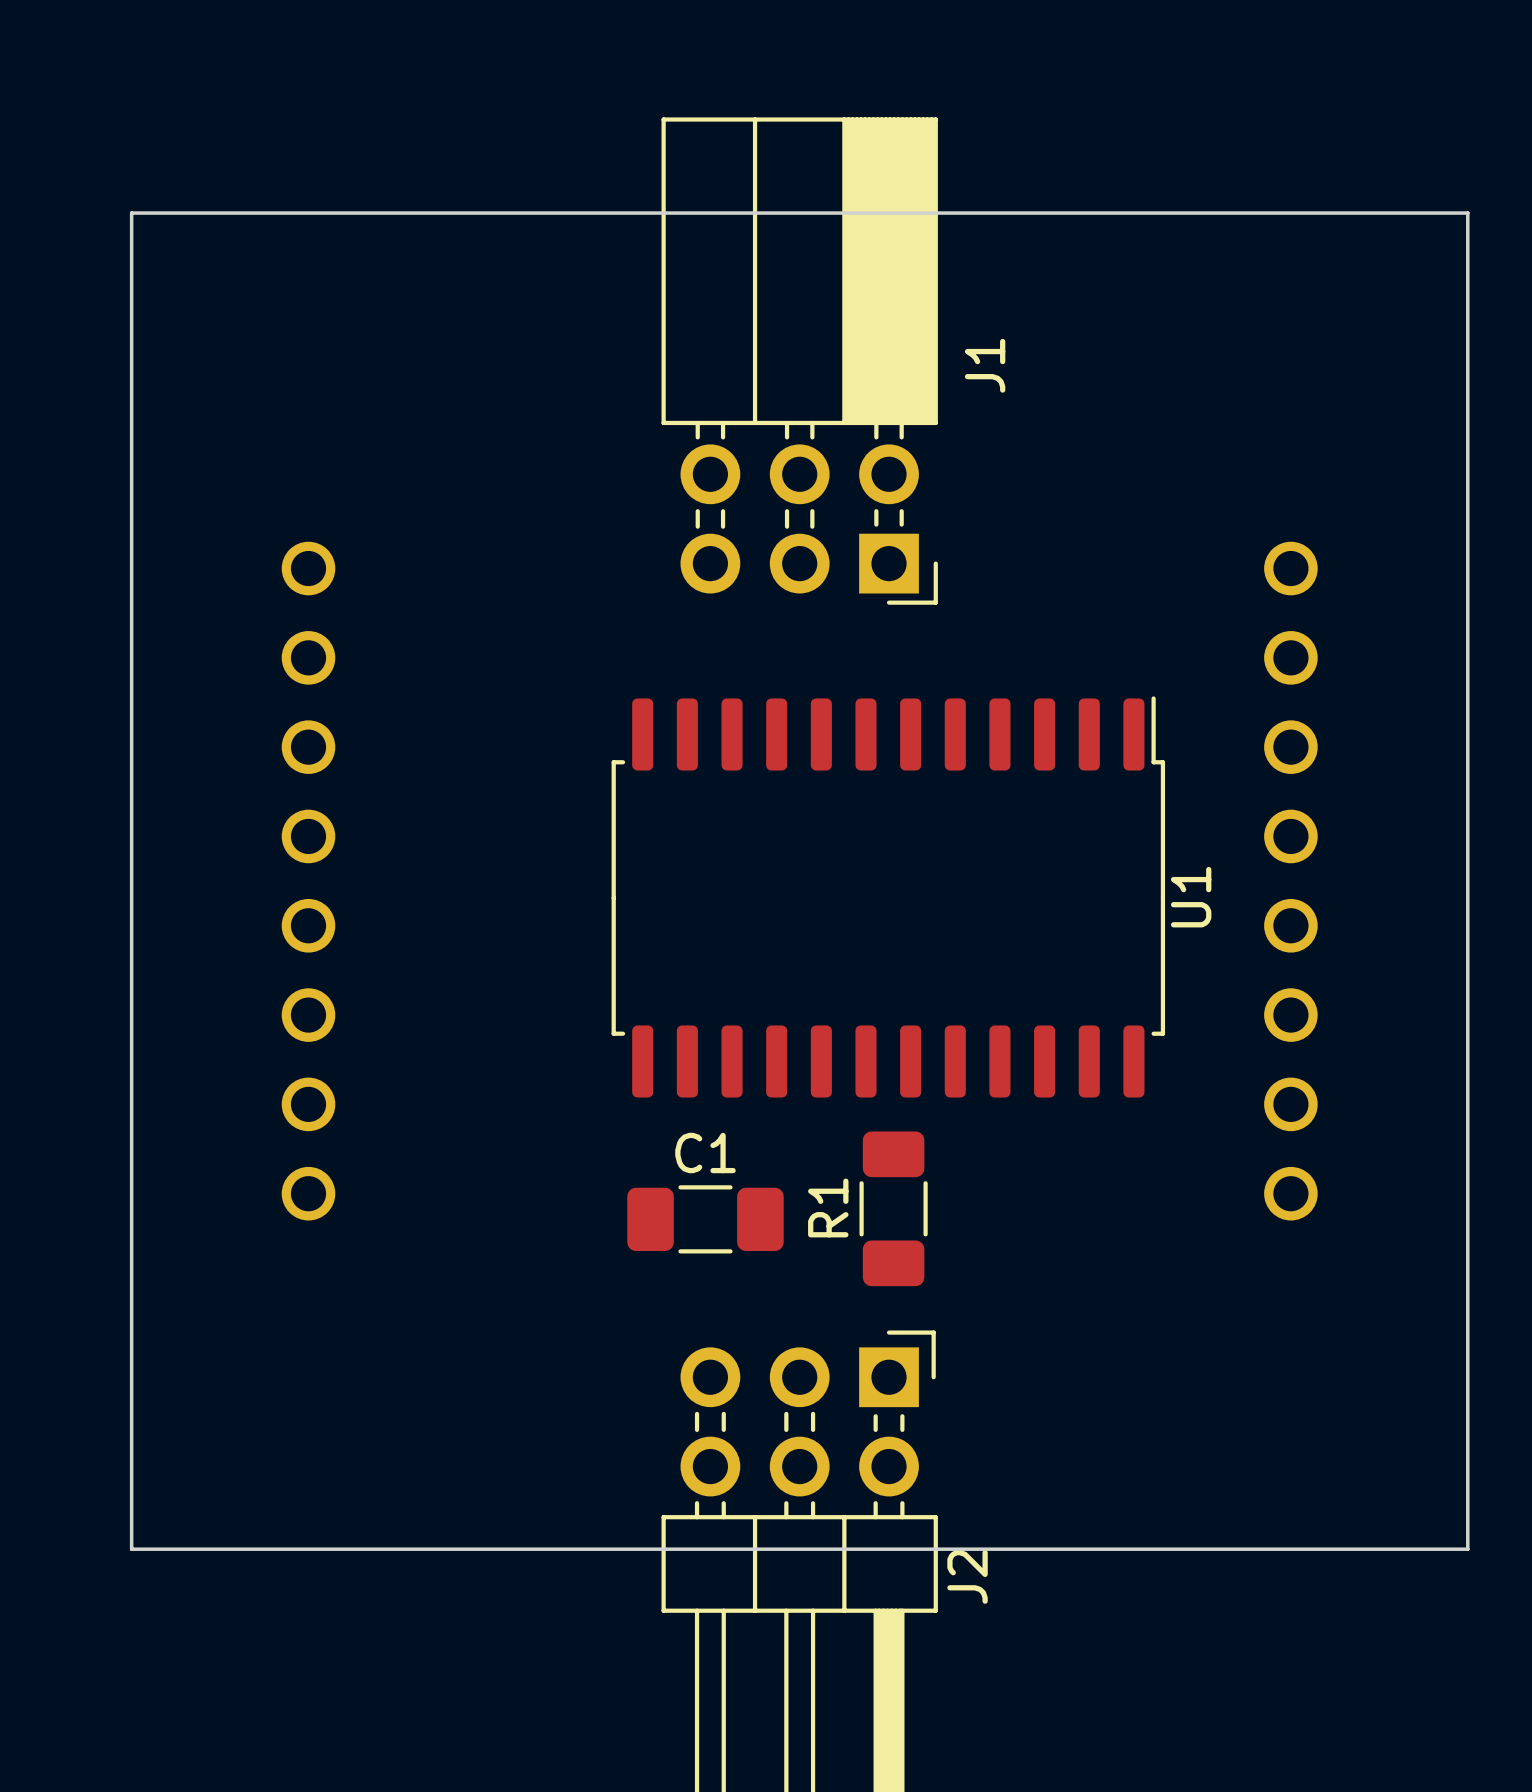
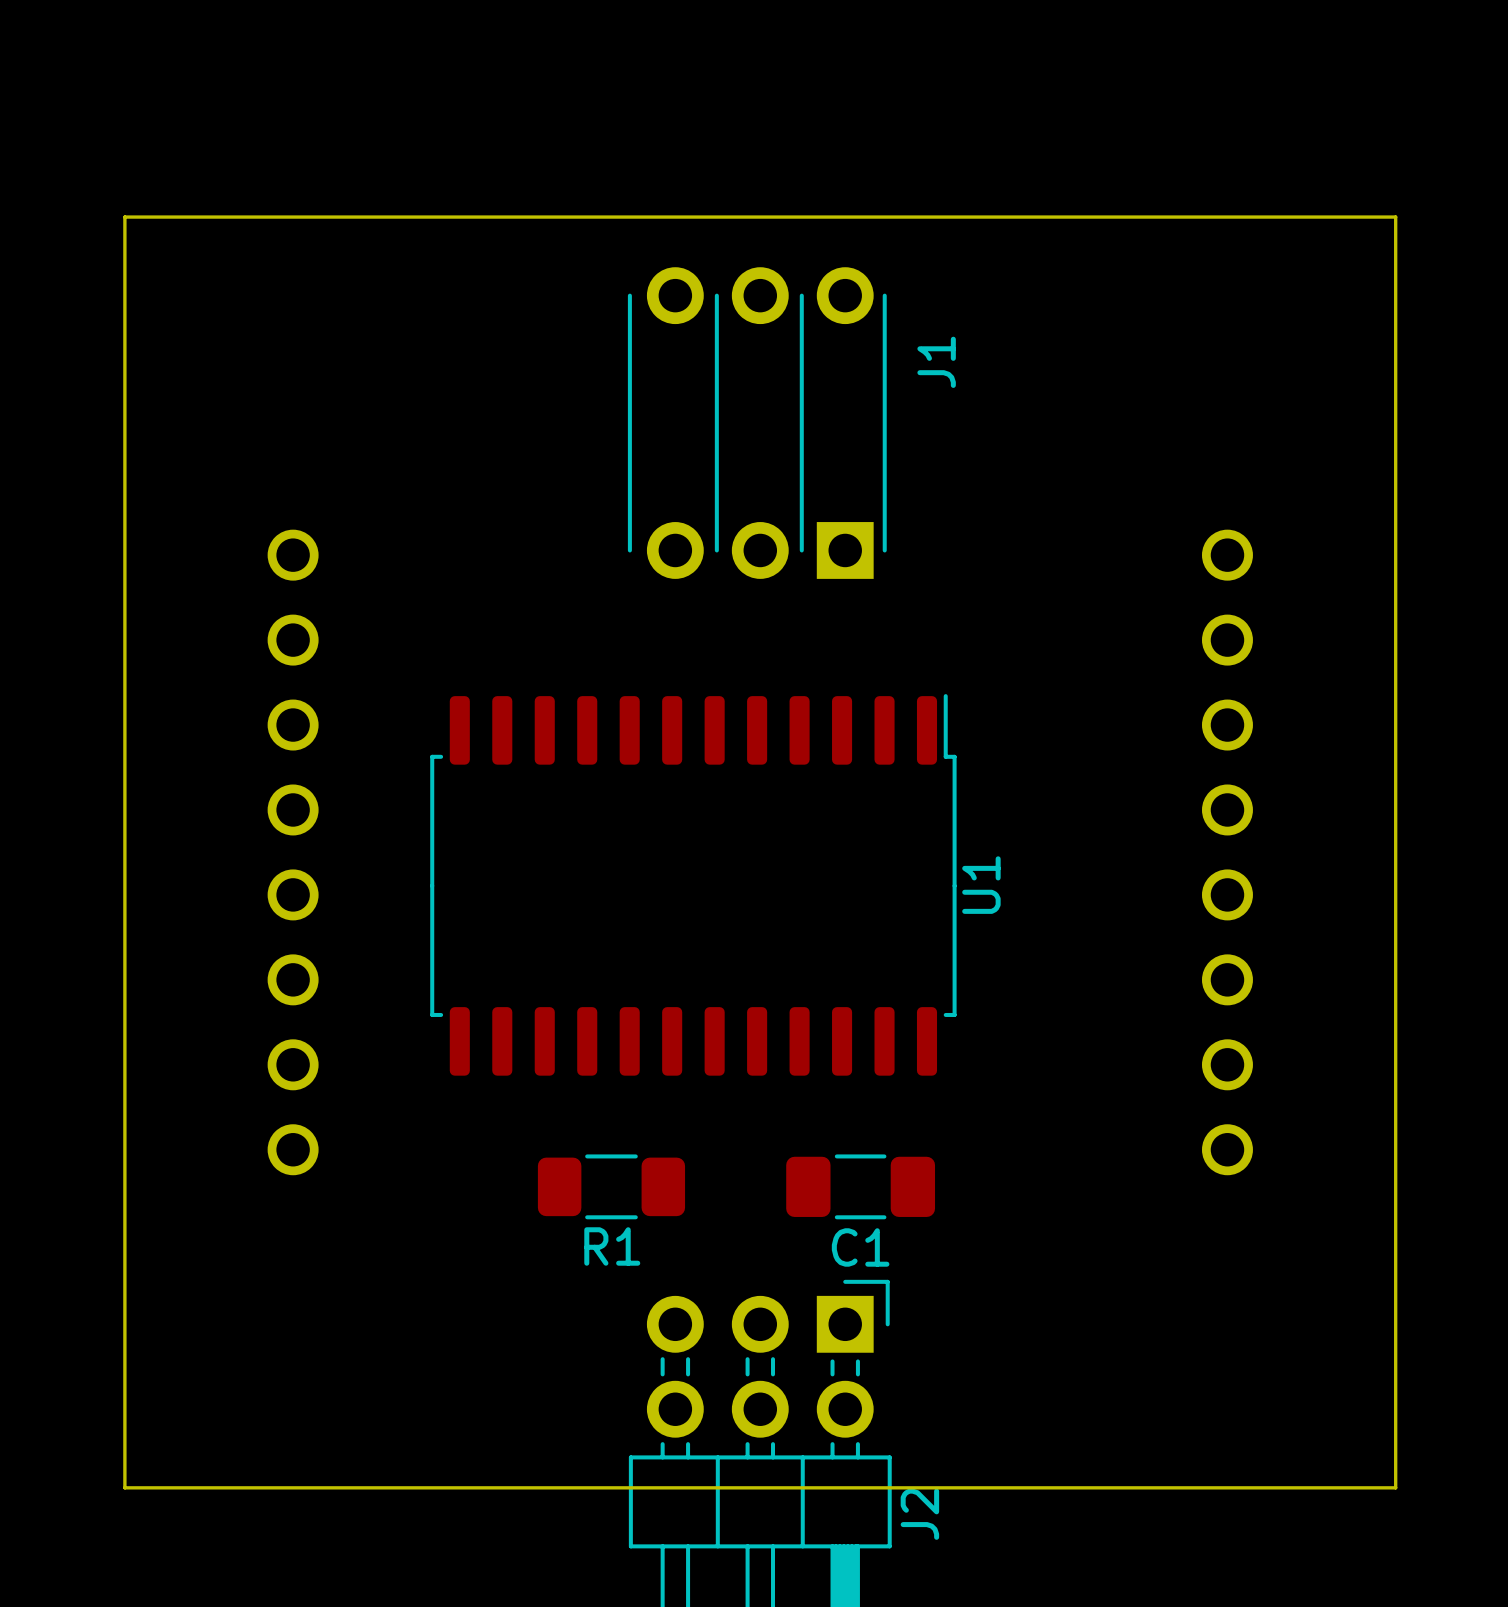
J1 footprint: [661, 117, 938, 605] -> [627, 267, 887, 579]
U1 position: (888, 896) -> (693, 884)
C1 name position: C1 (705, 1153) -> C1 (860, 1247)
R1 name position: R1 (828, 1207) -> R1 (612, 1246)
R1 rotation: 0° (893, 1208) -> 90° clockwise (611, 1186)
R1 position: (893, 1208) -> (611, 1186)
C1 position: (705, 1219) -> (860, 1186)

